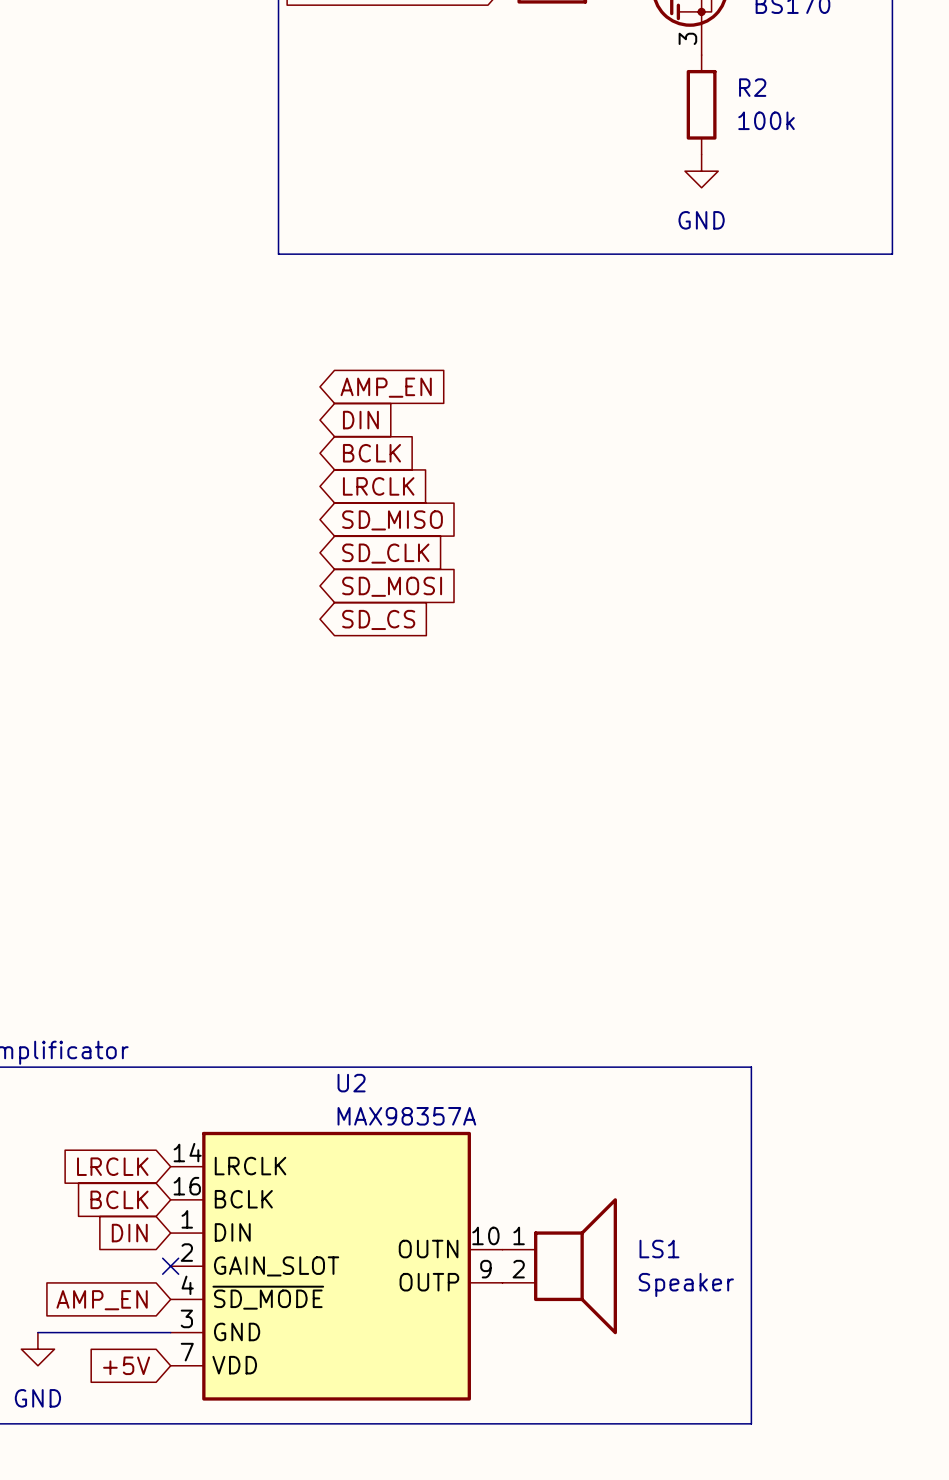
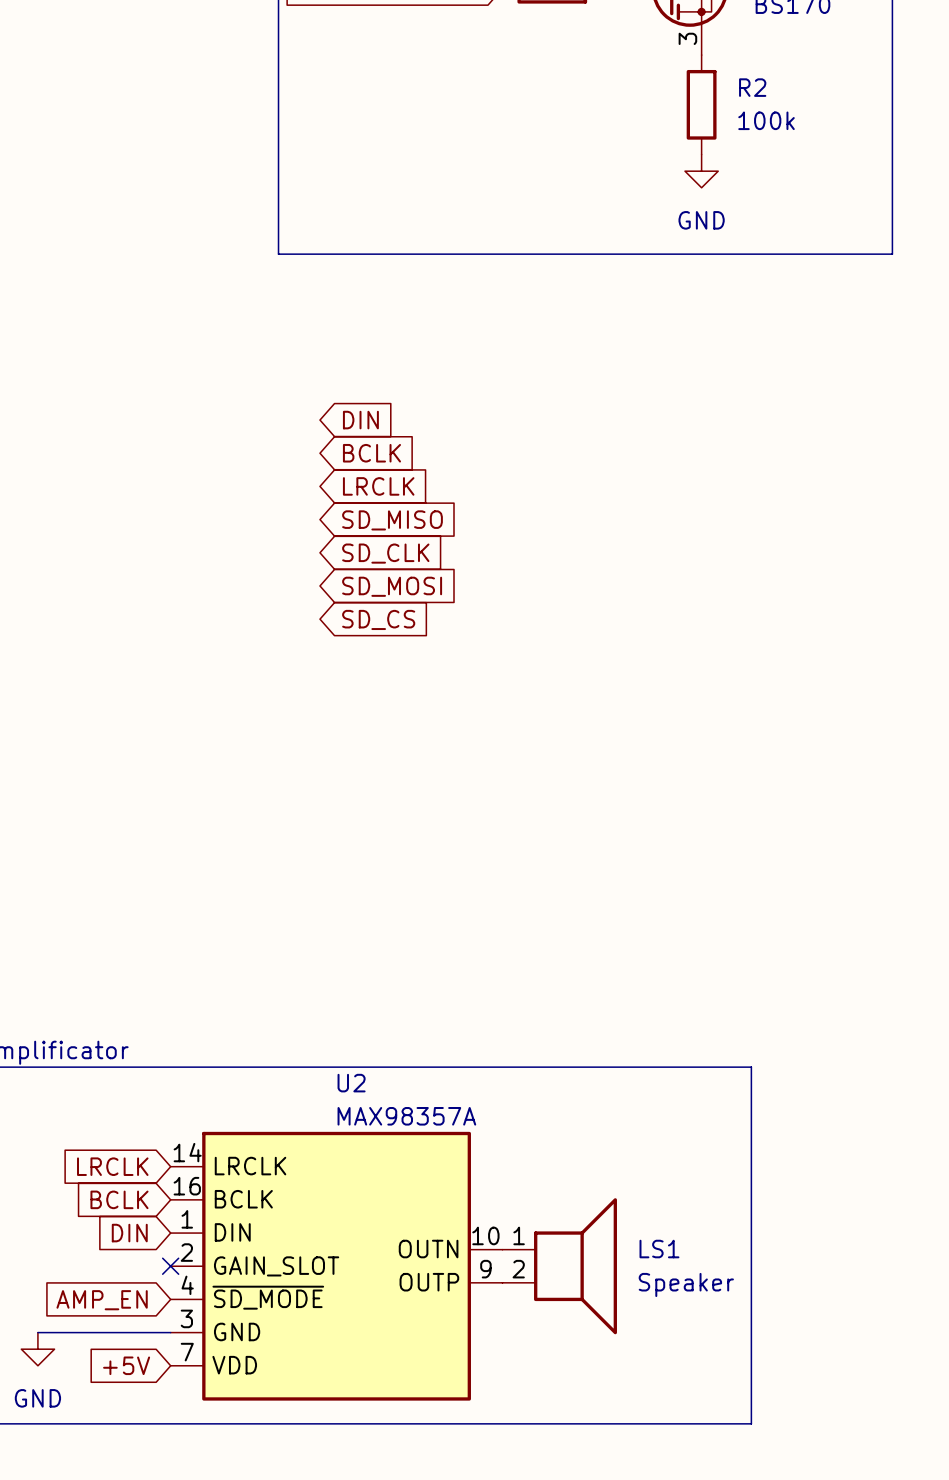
global label: AMP_EN (386, 387) -> none

